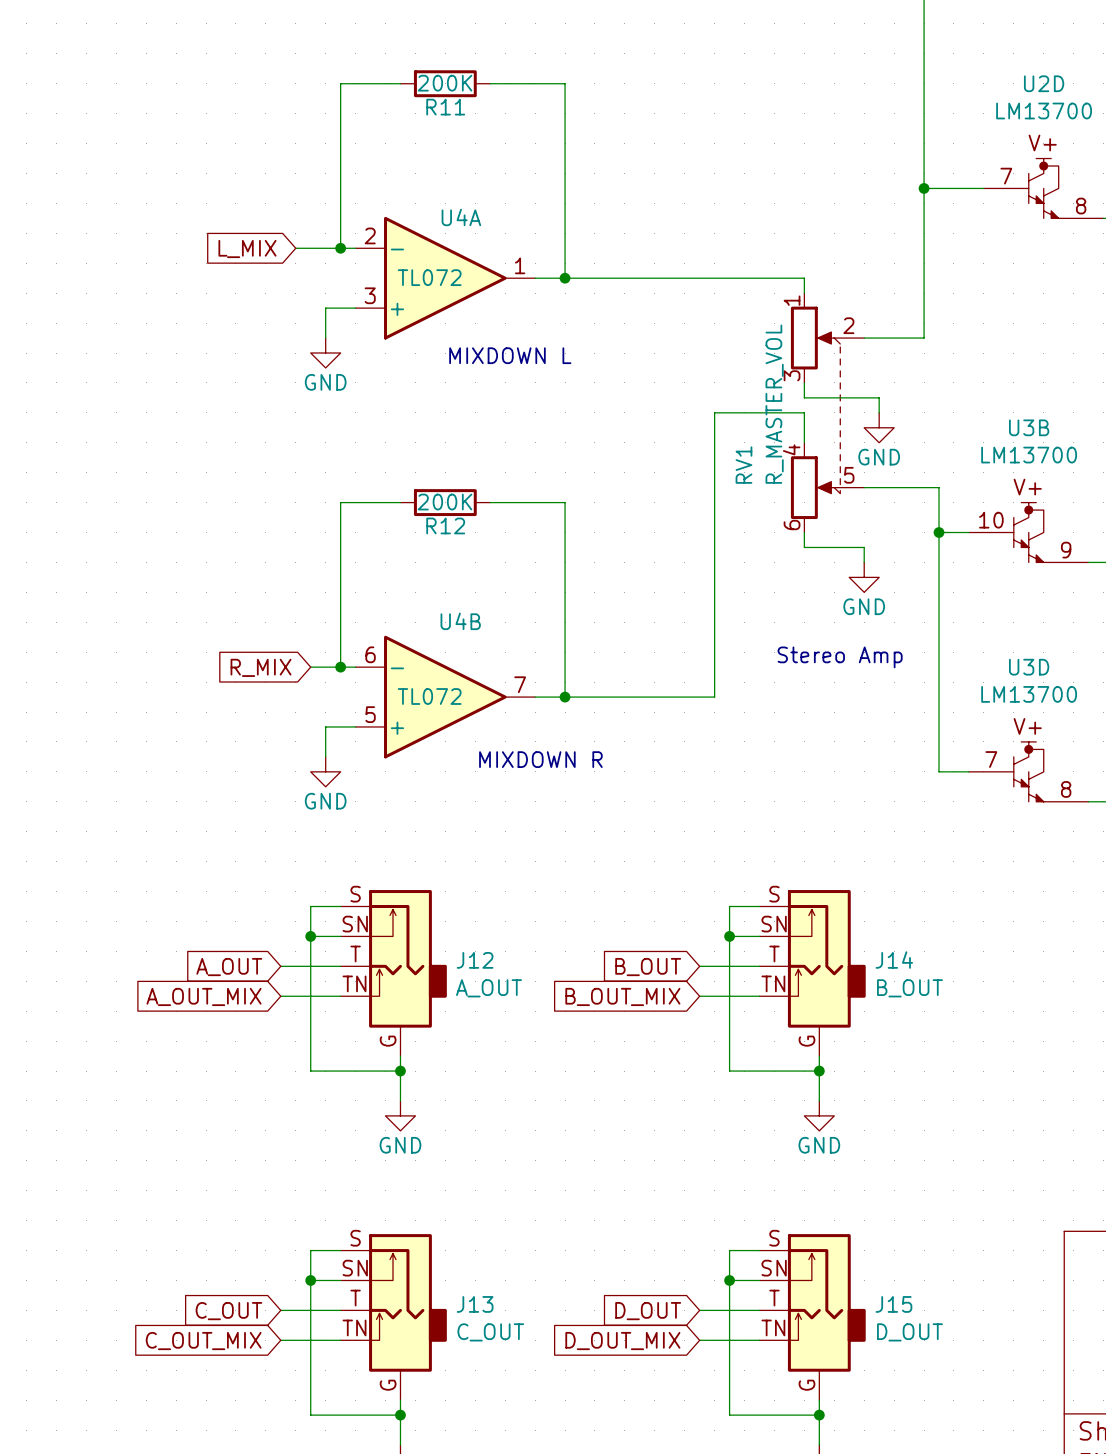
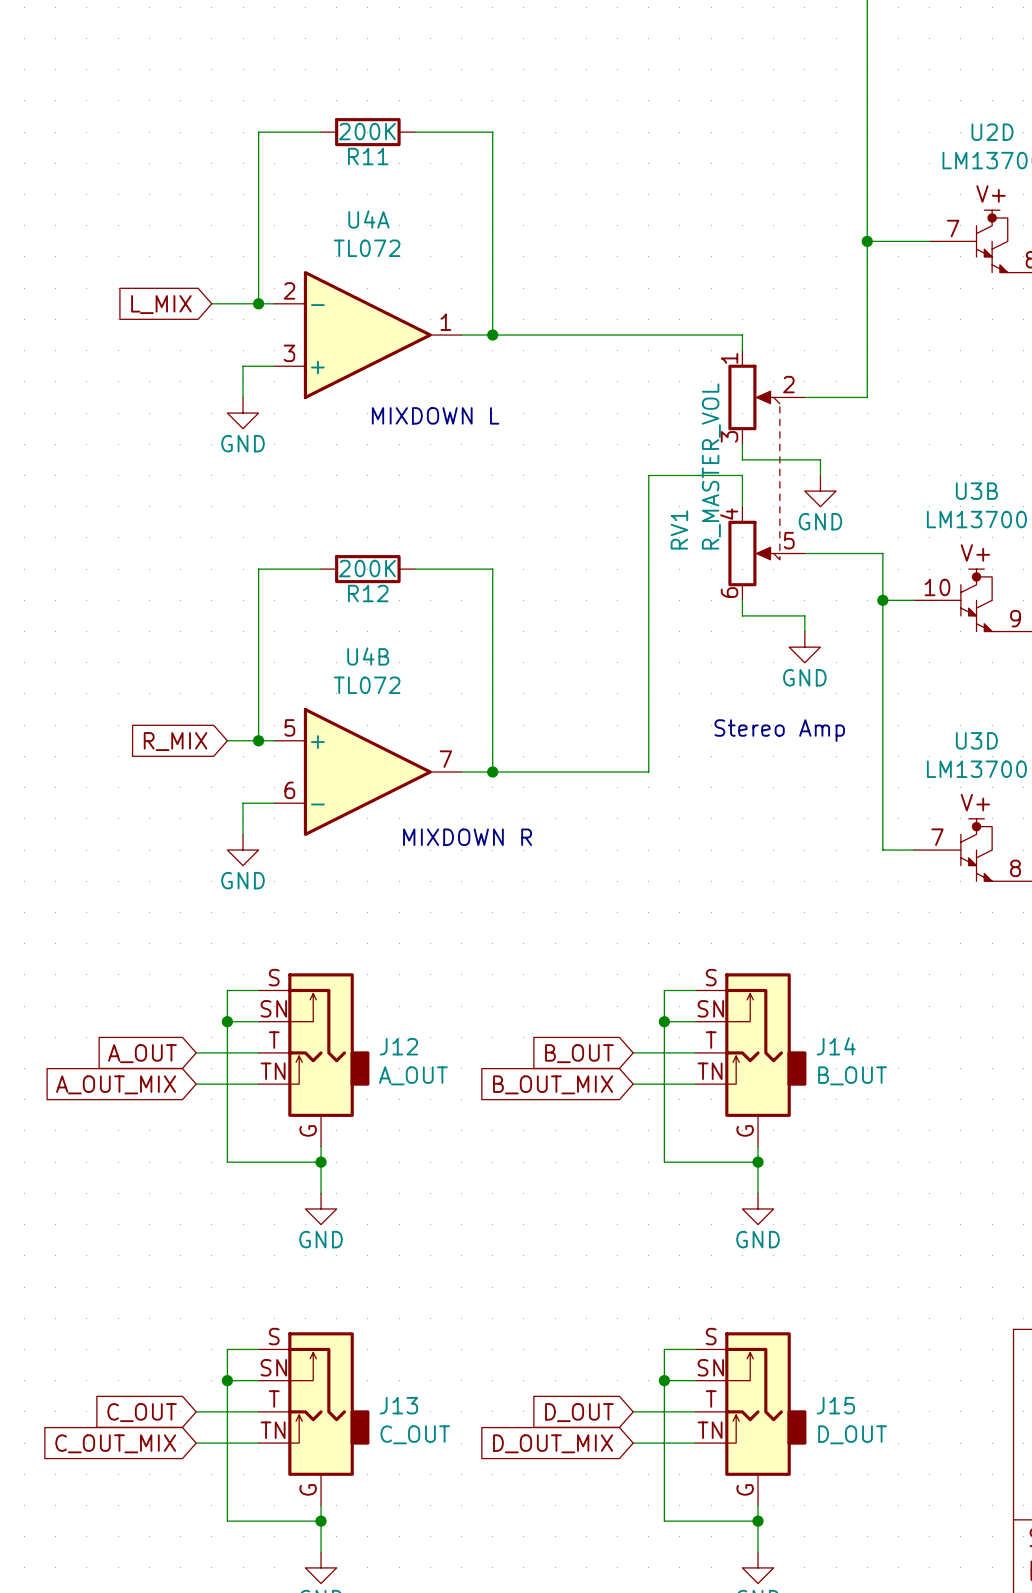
U4A name position: U4A (461, 217) -> U4A (368, 219)
U4A value position: TL072 (429, 277) -> TL072 (367, 248)
U4B name position: U4B (460, 621) -> U4B (368, 656)
U4B value position: TL072 (429, 696) -> TL072 (367, 685)
U4B flip: as is (445, 697) -> up-down (367, 772)

